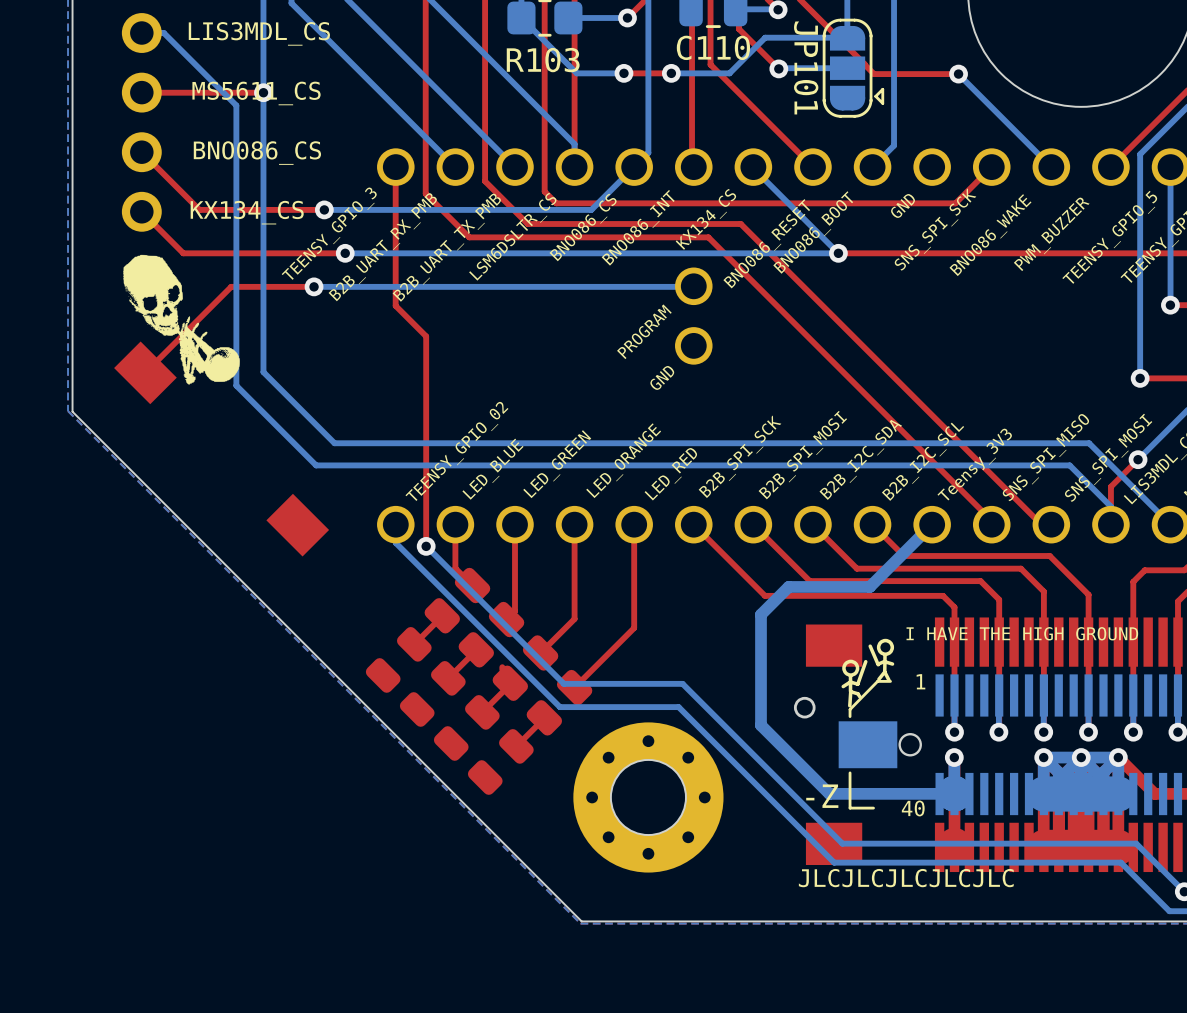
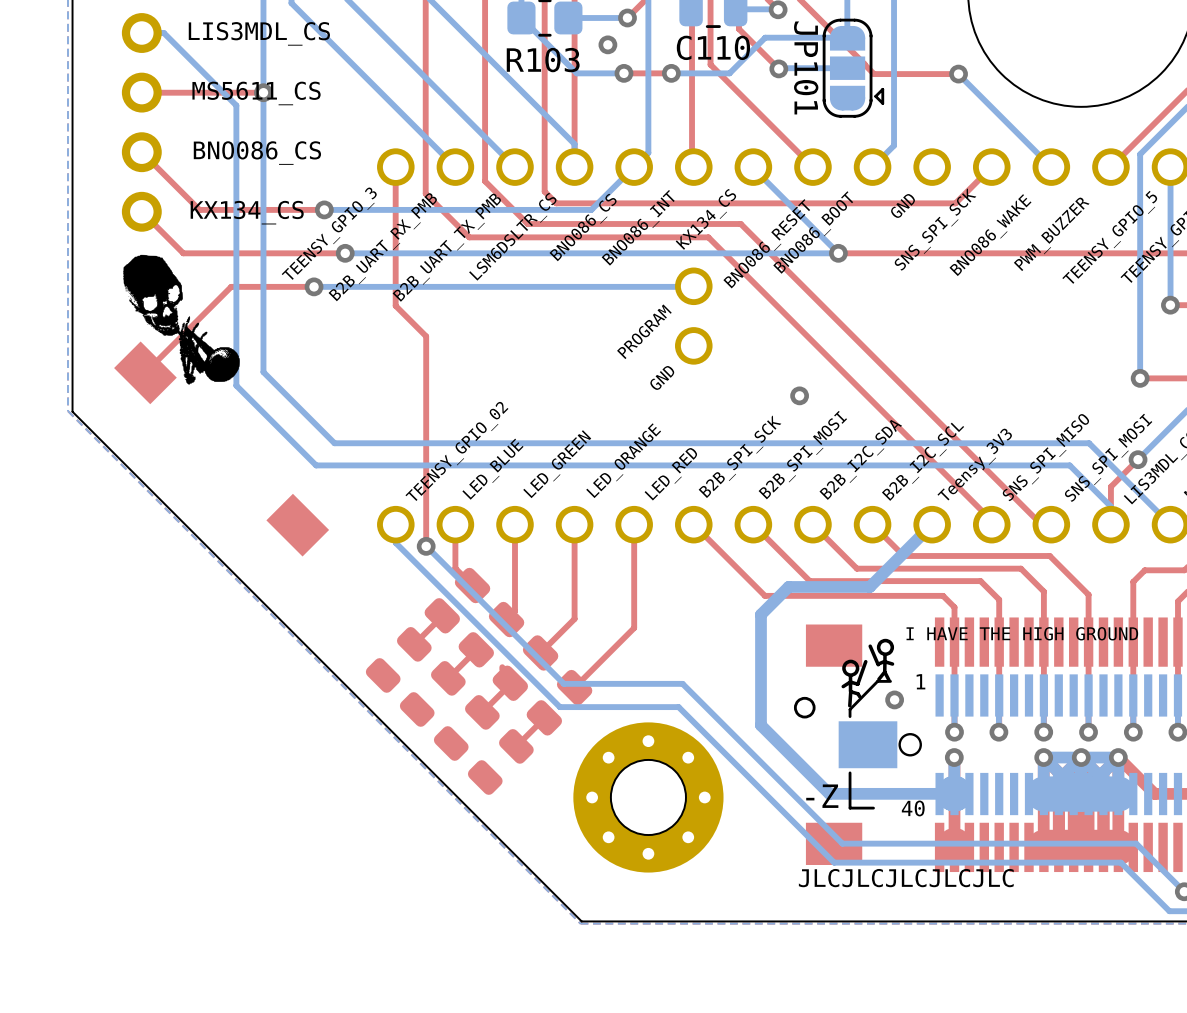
via: none -> (607, 44)
via: none -> (799, 395)
via: none -> (894, 699)

